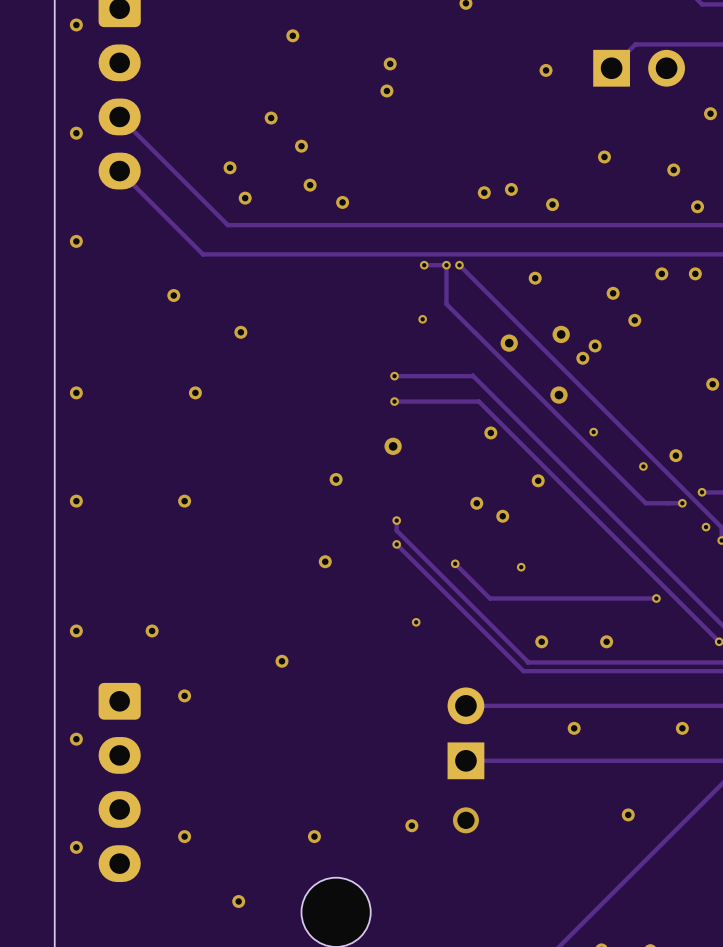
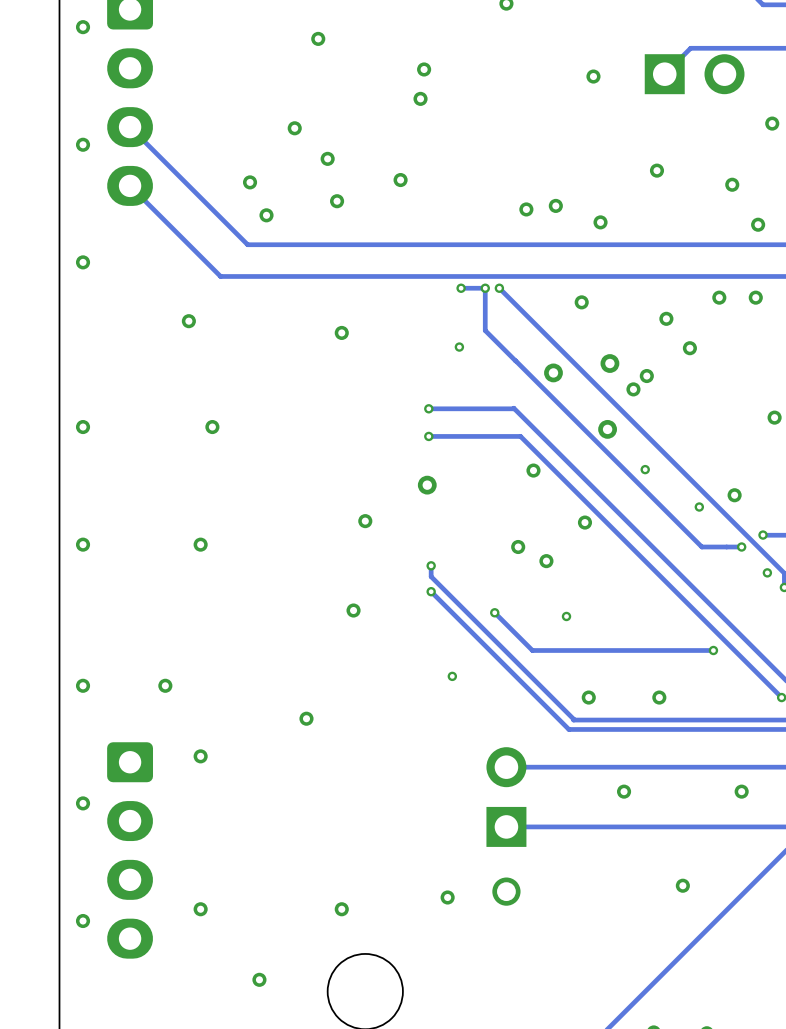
via position: (342, 202) -> (400, 180)
via: none -> (341, 332)
via: (240, 332) -> none

